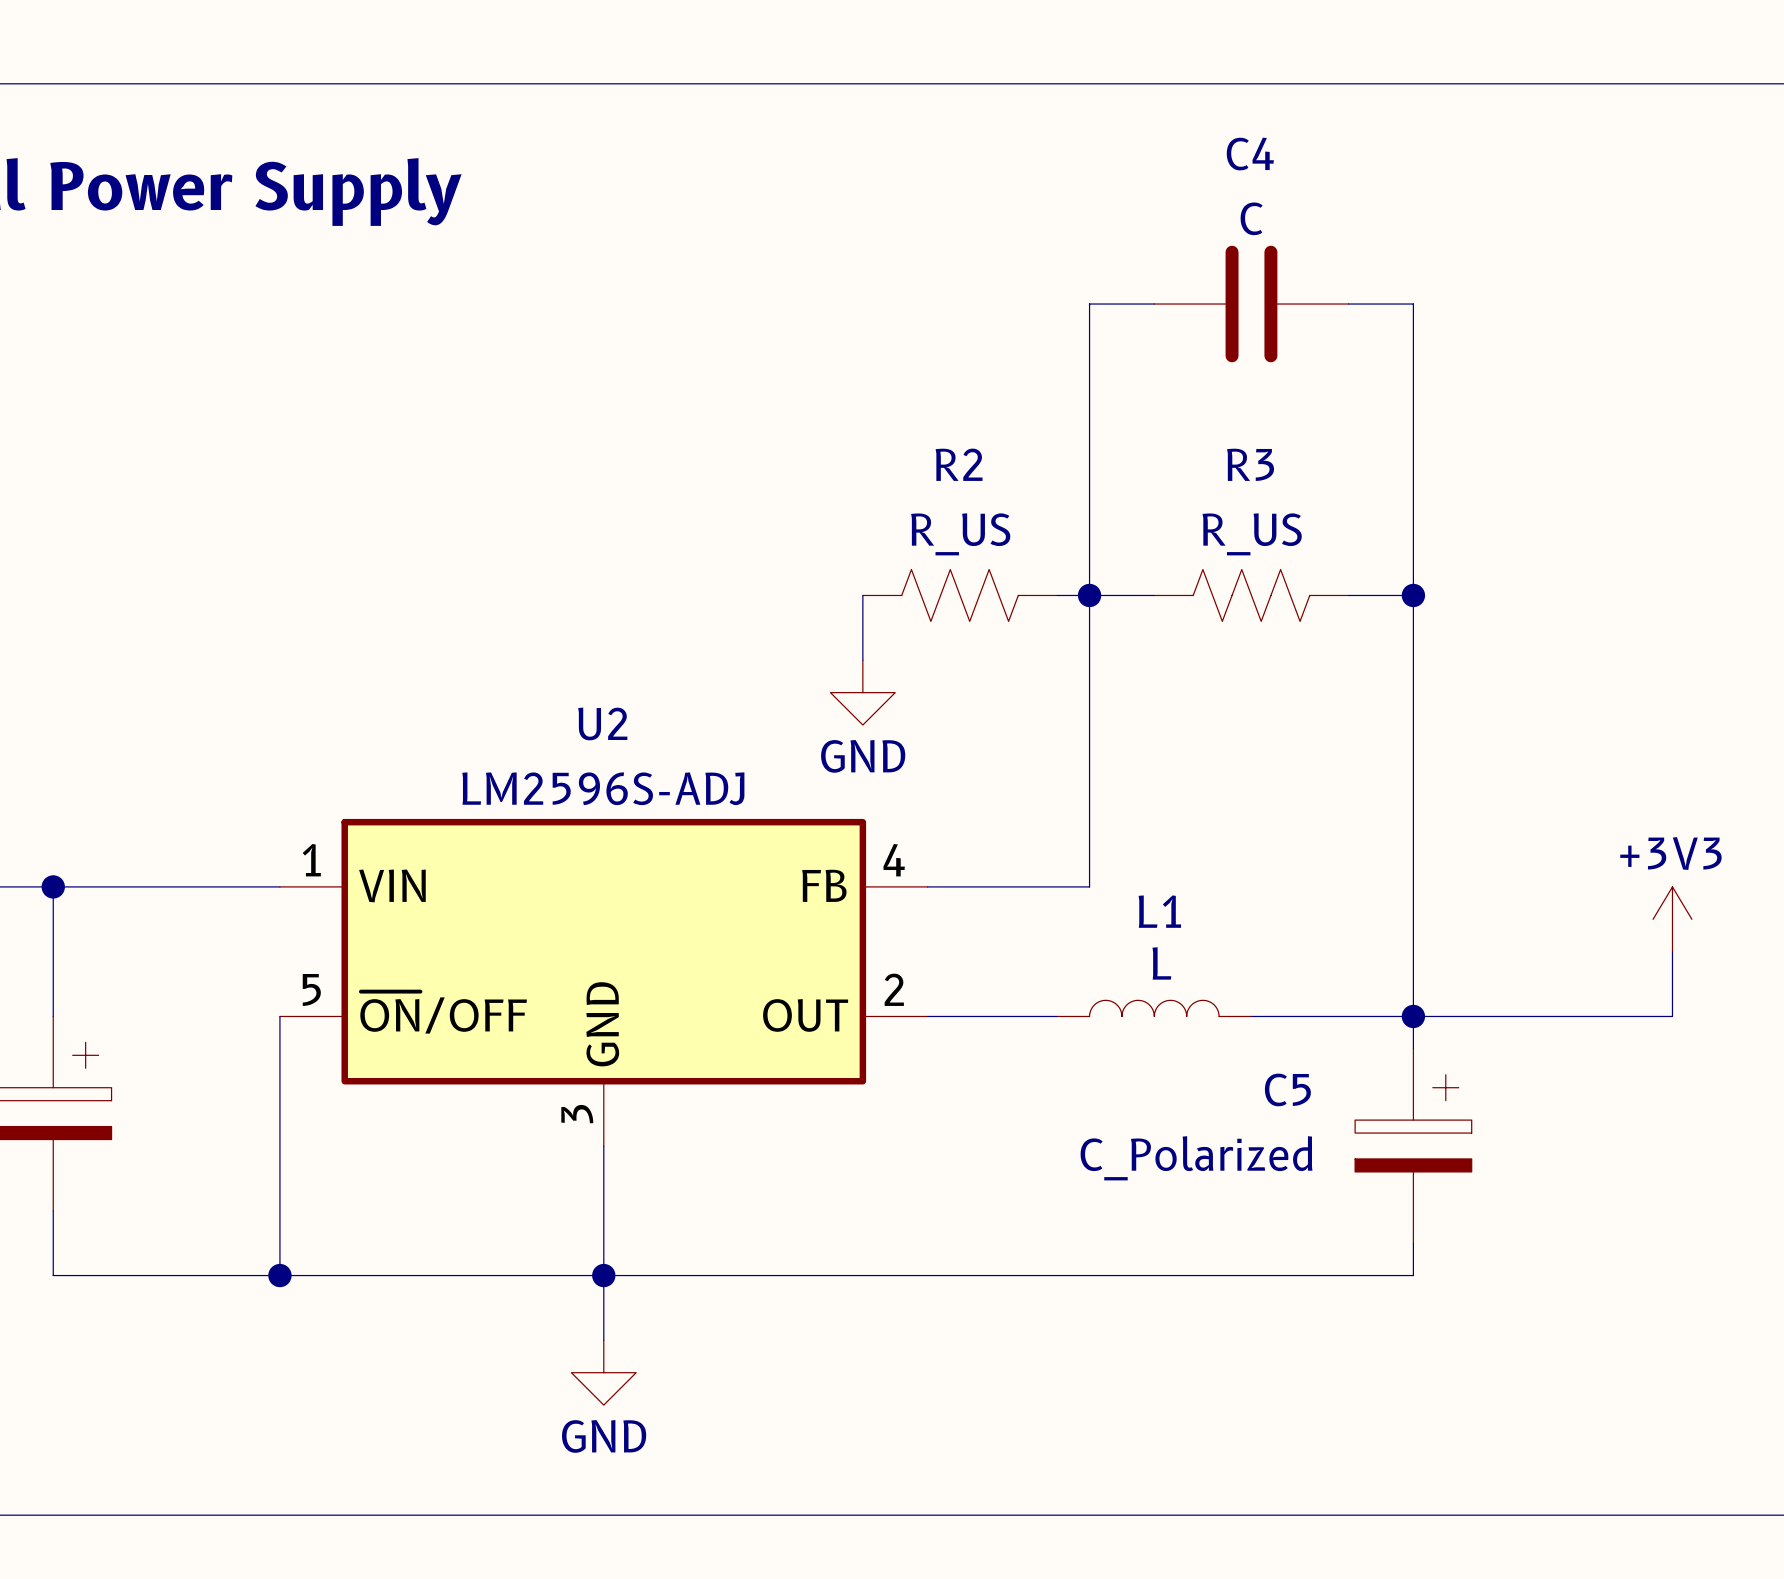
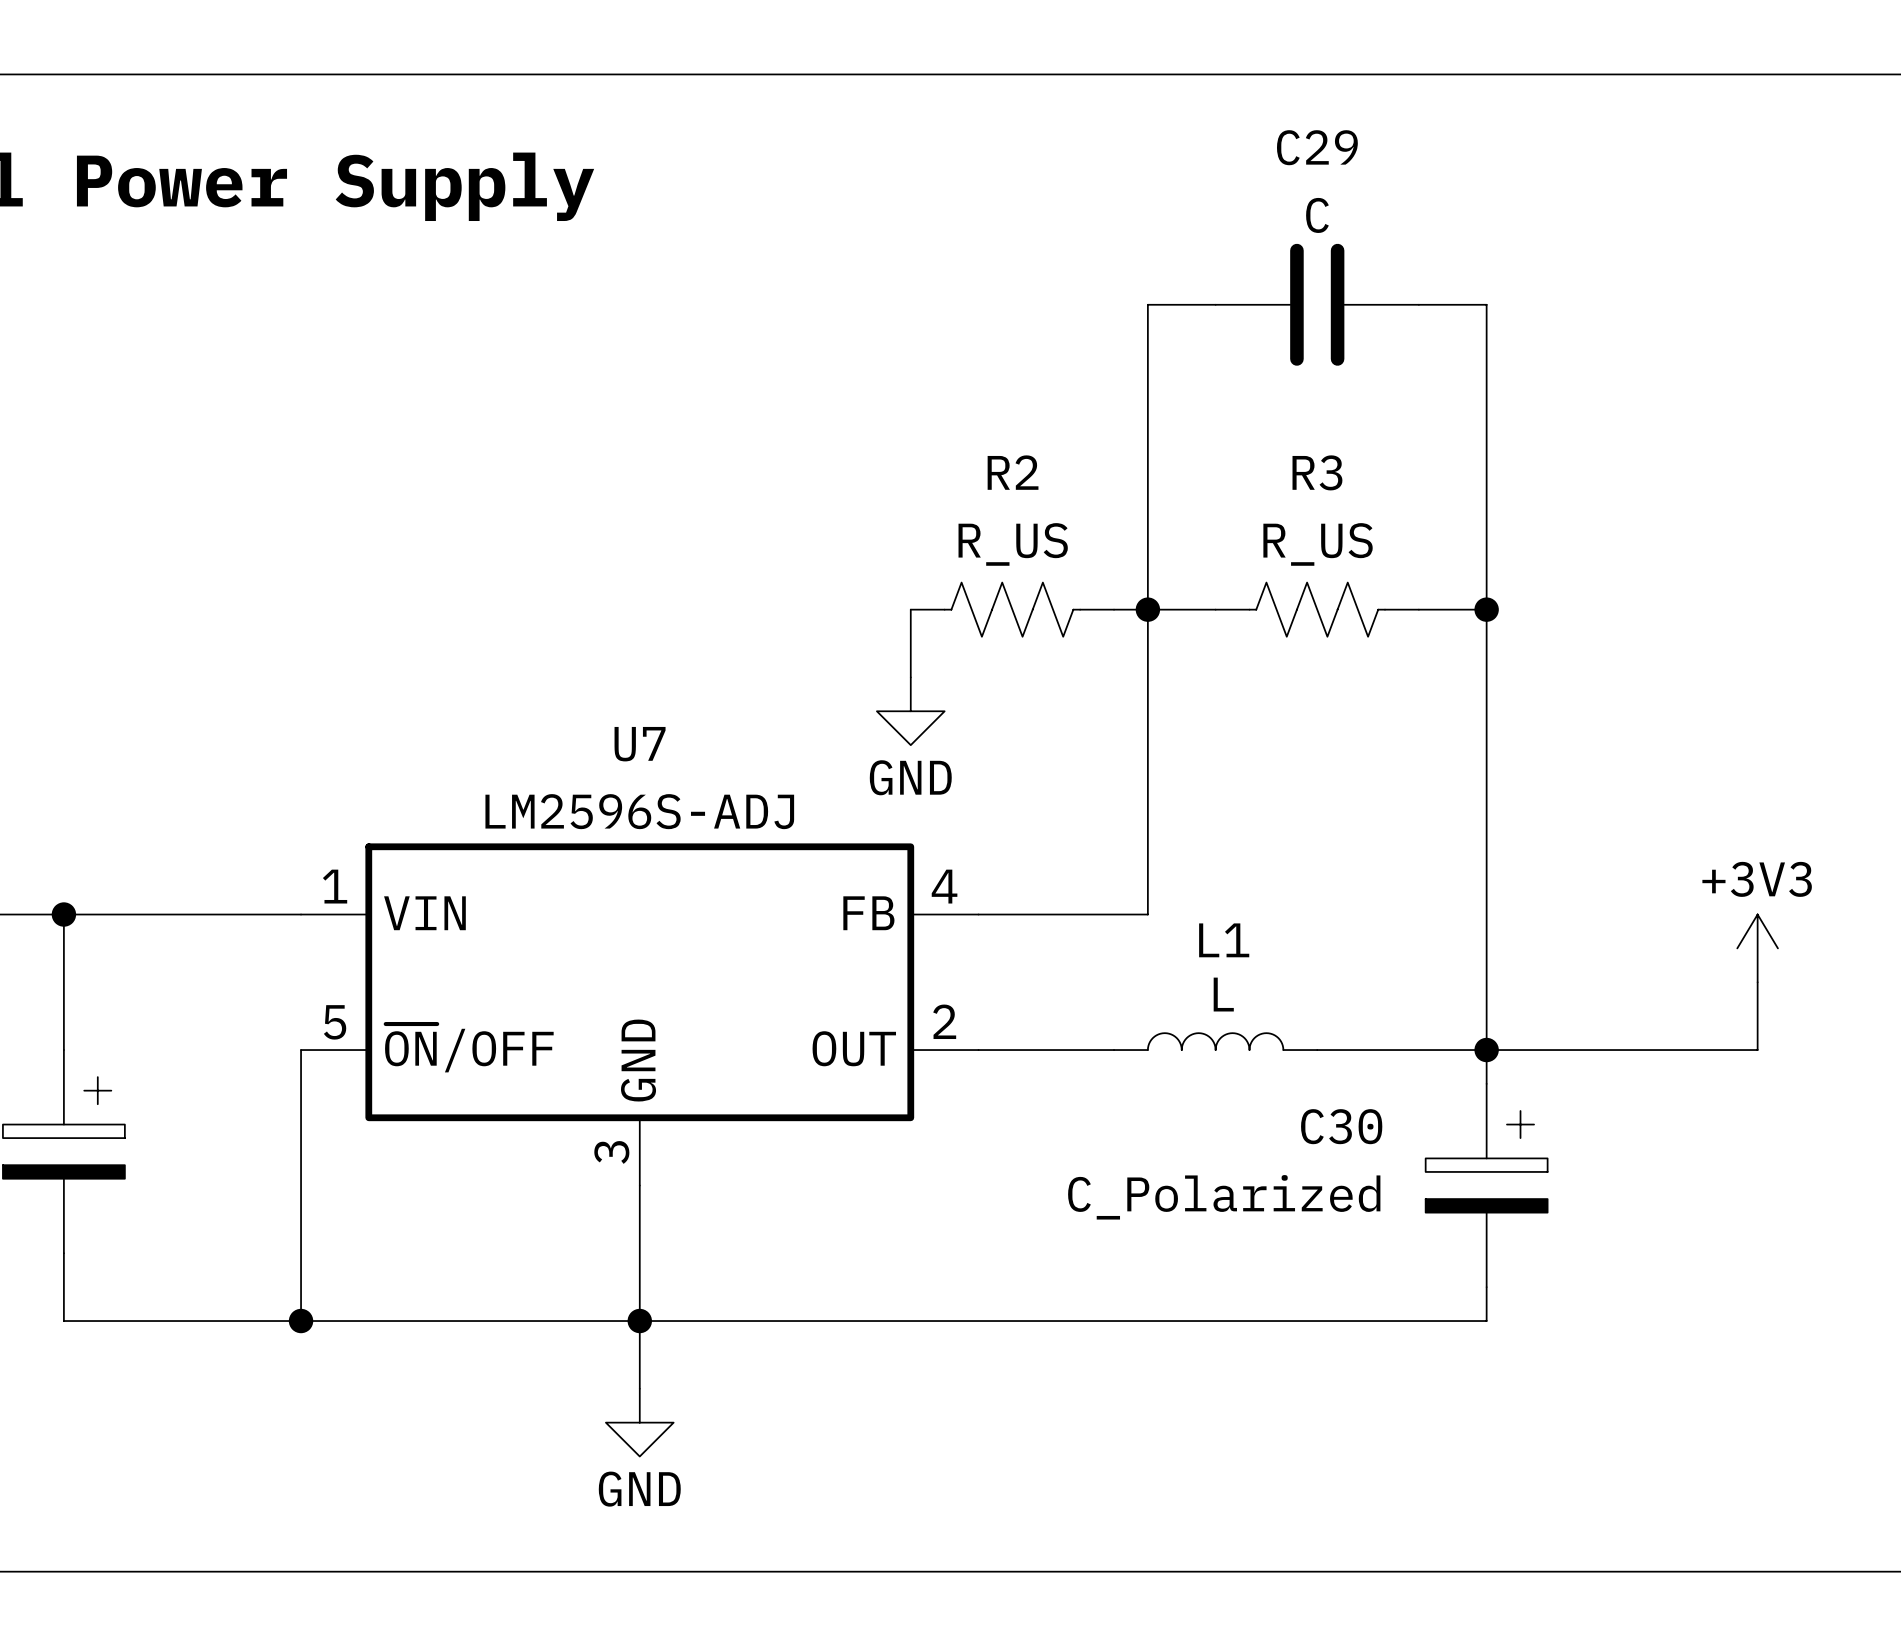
C4 name: C4 (1250, 154) -> C29 (1317, 147)
U2 name: U2 (602, 723) -> U7 (640, 744)
C5 name: C5 (1287, 1089) -> C30 (1341, 1126)

